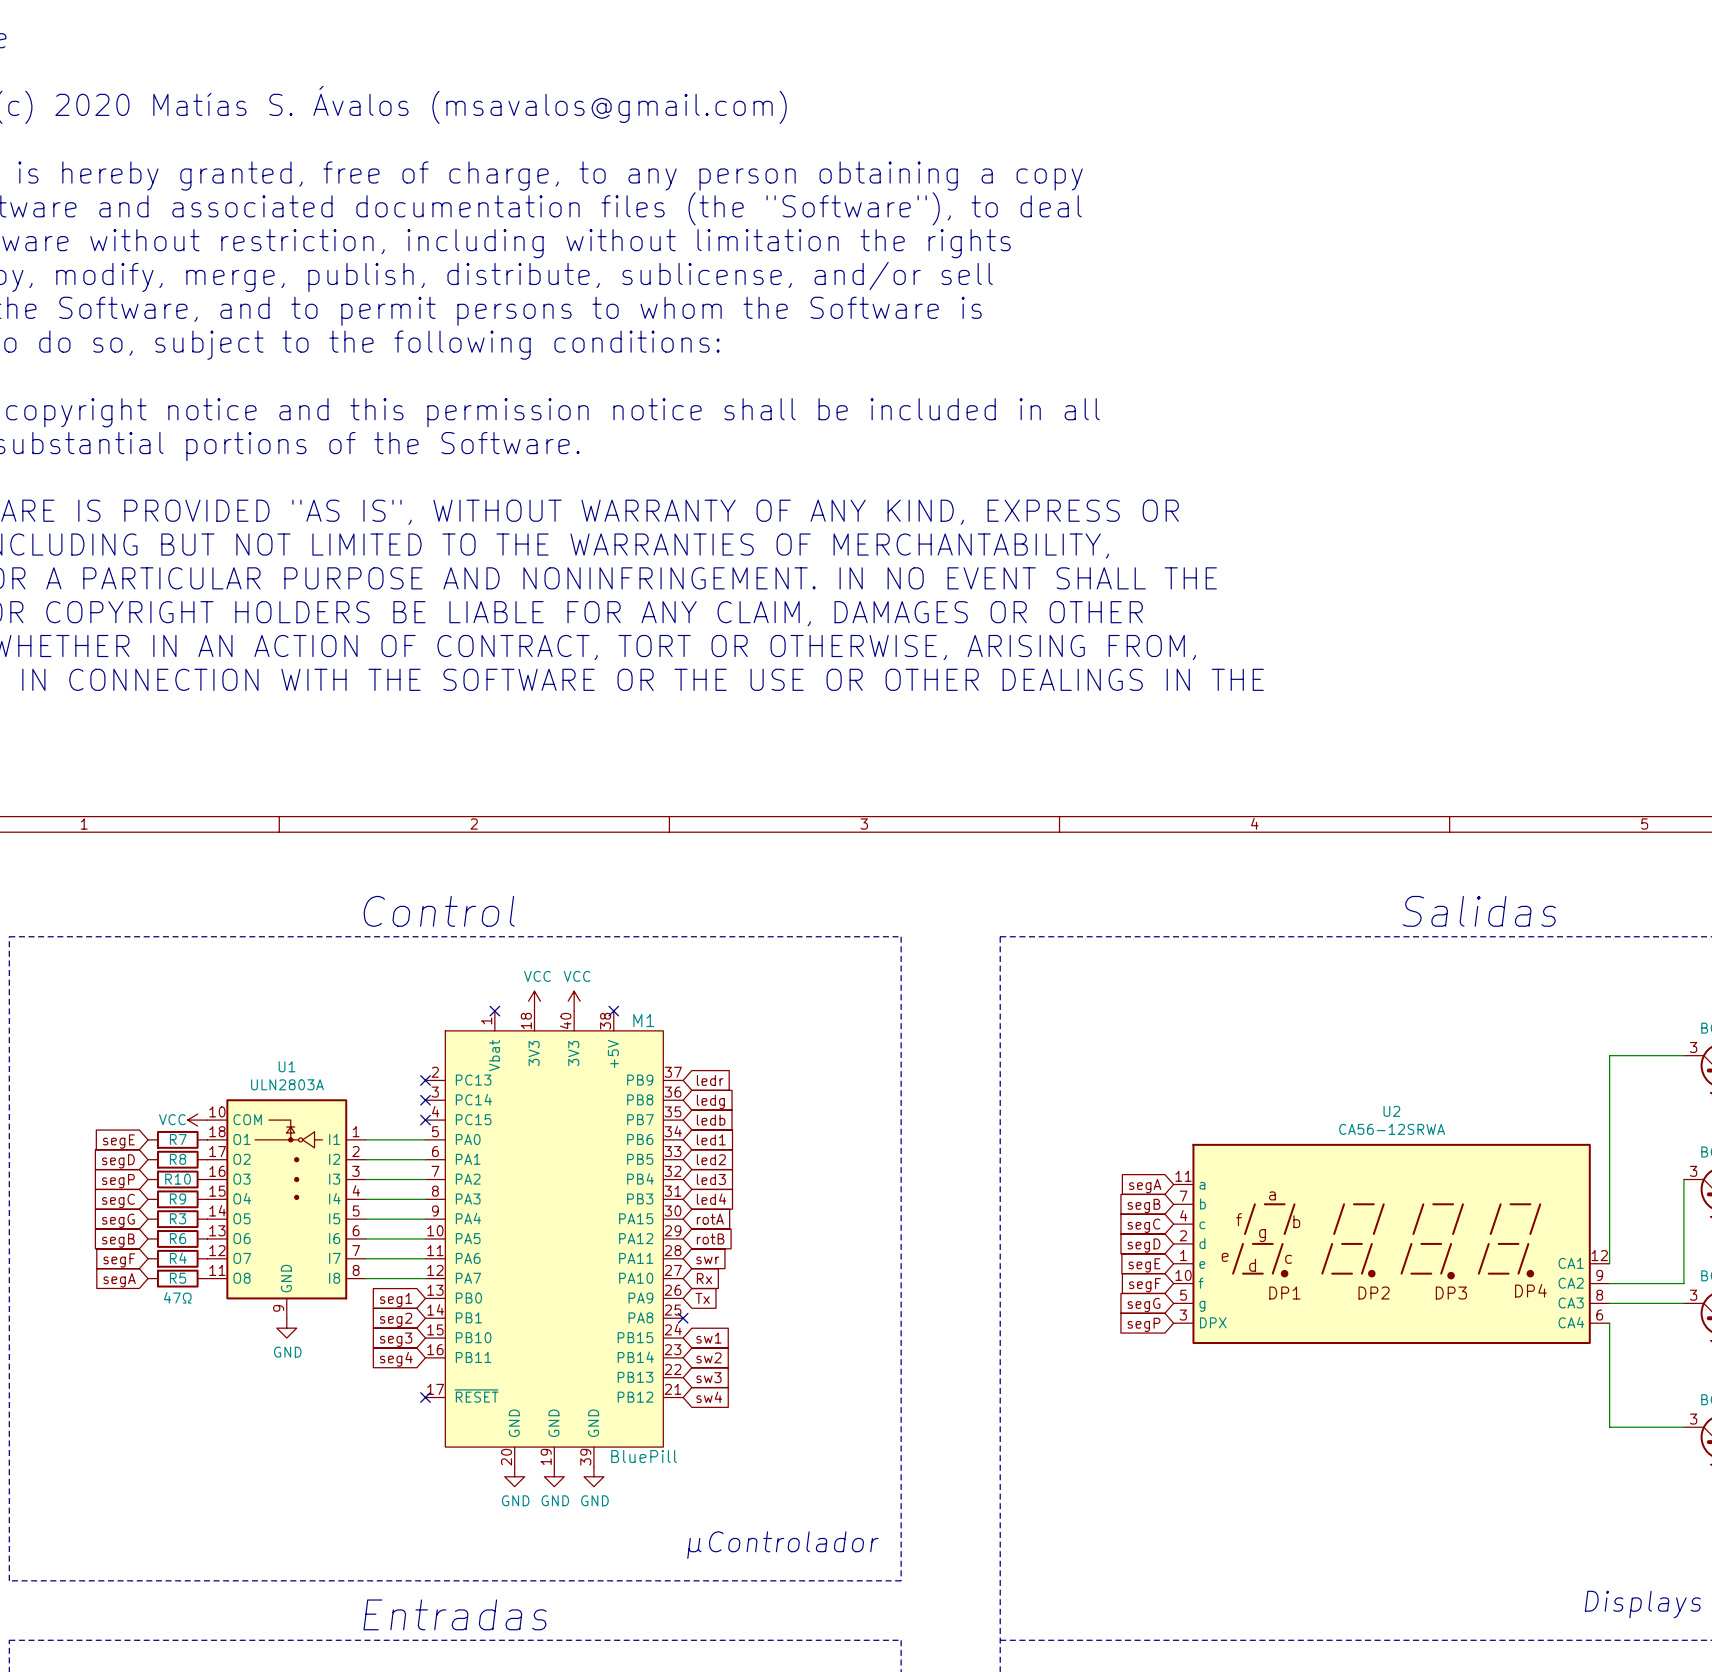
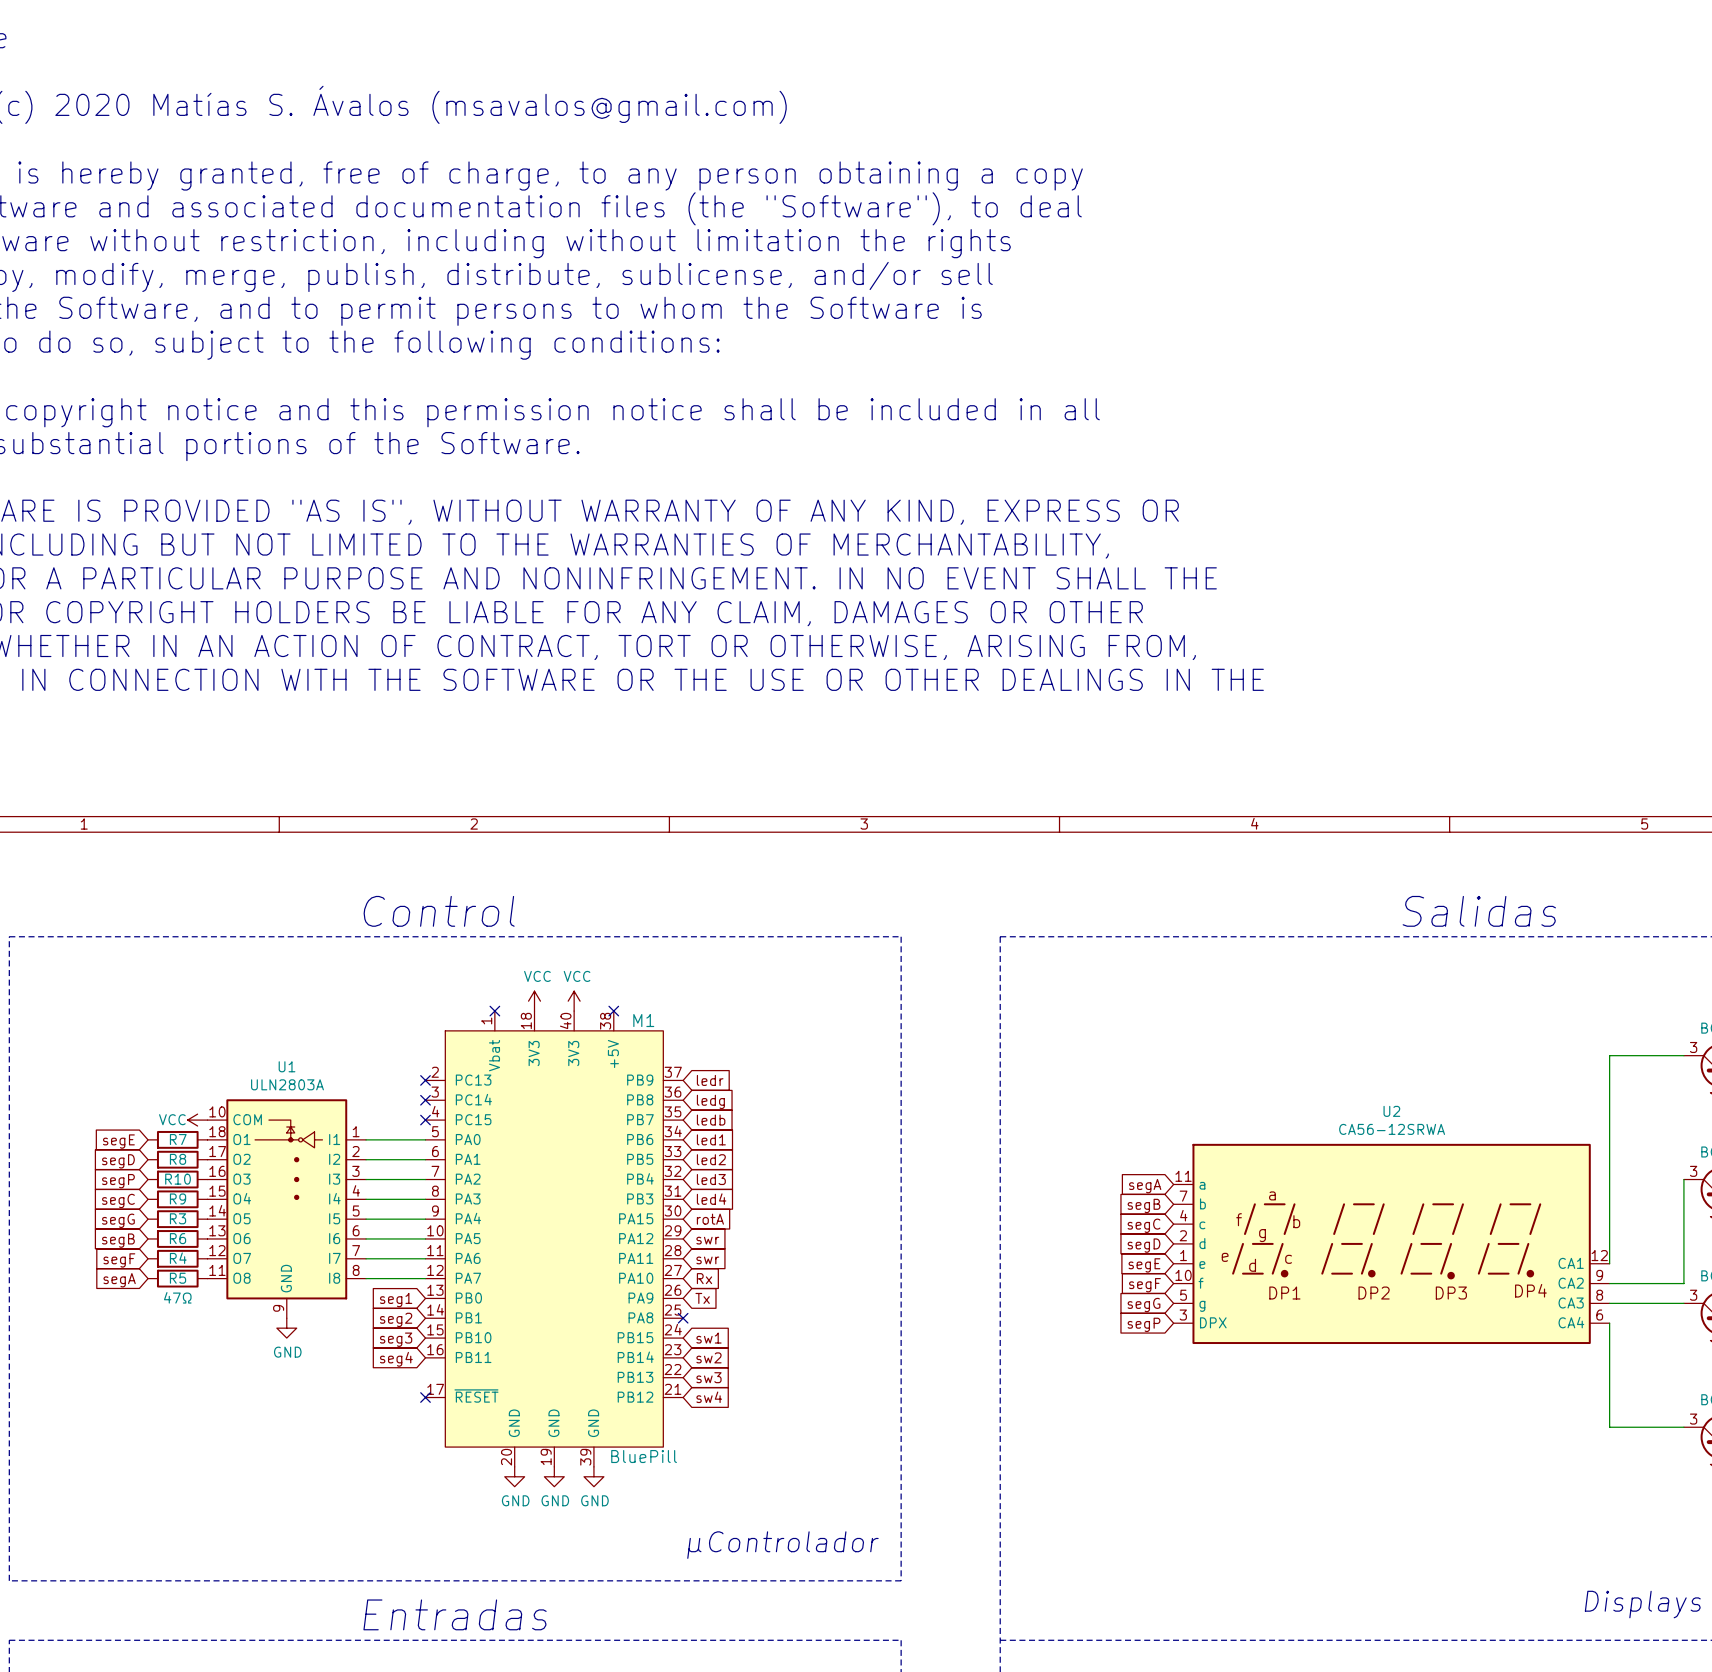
global label: rotB (710, 1238) -> swr (707, 1240)

